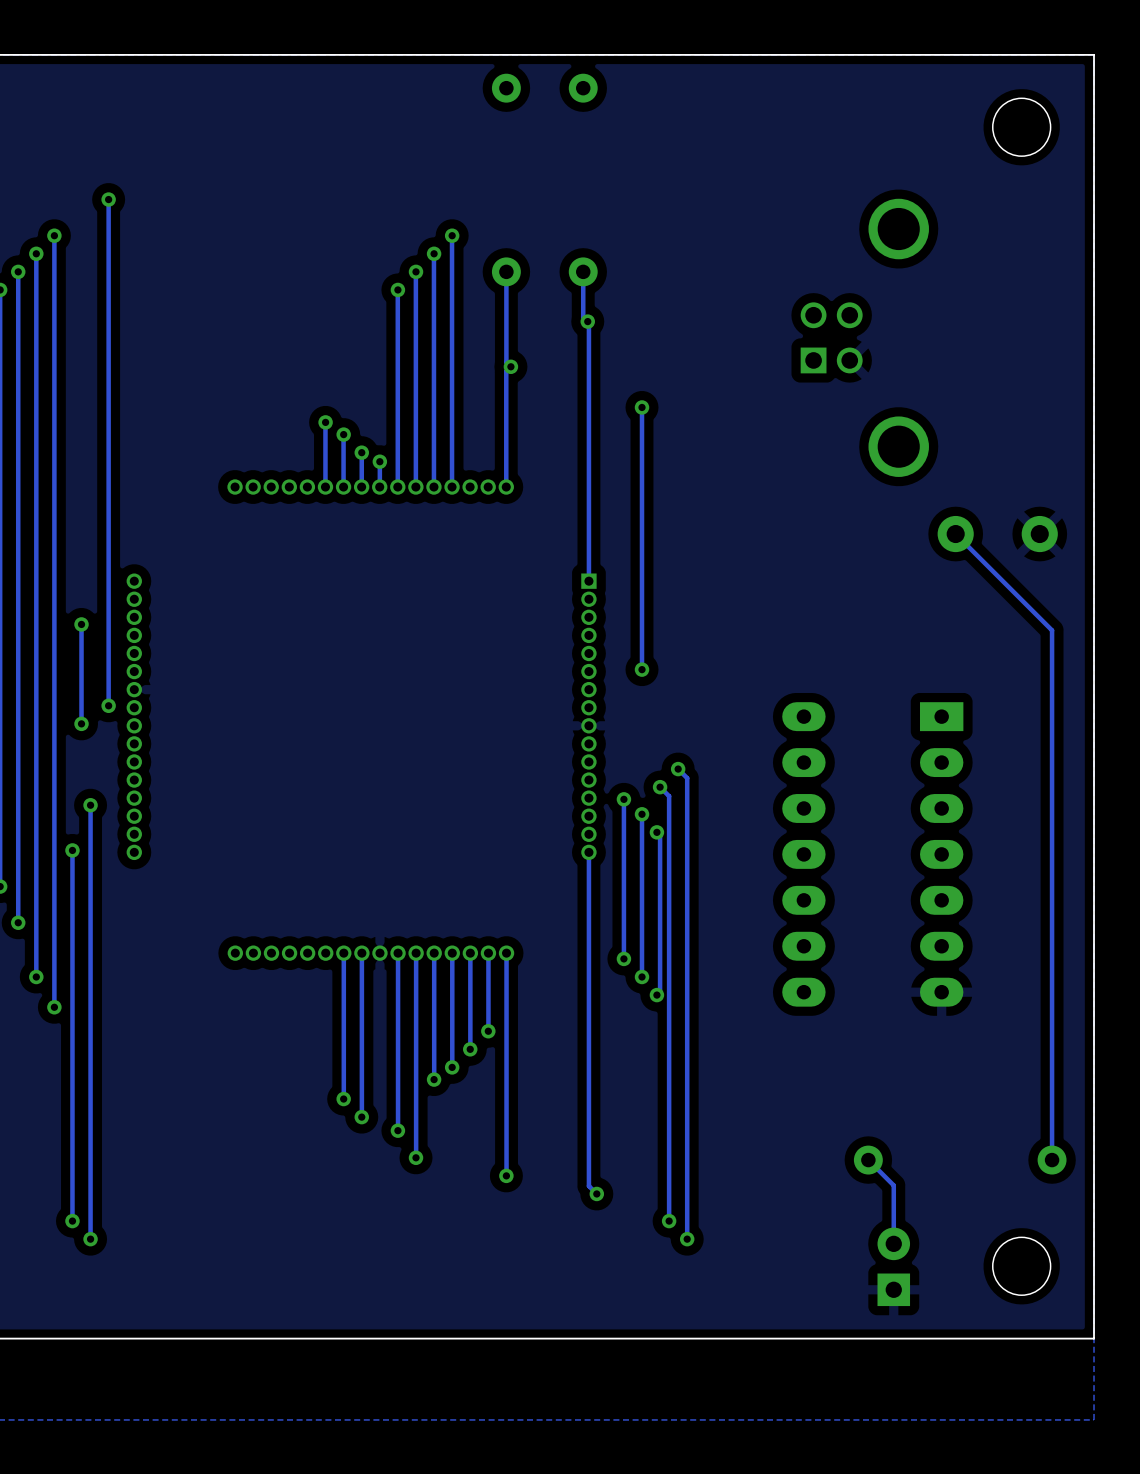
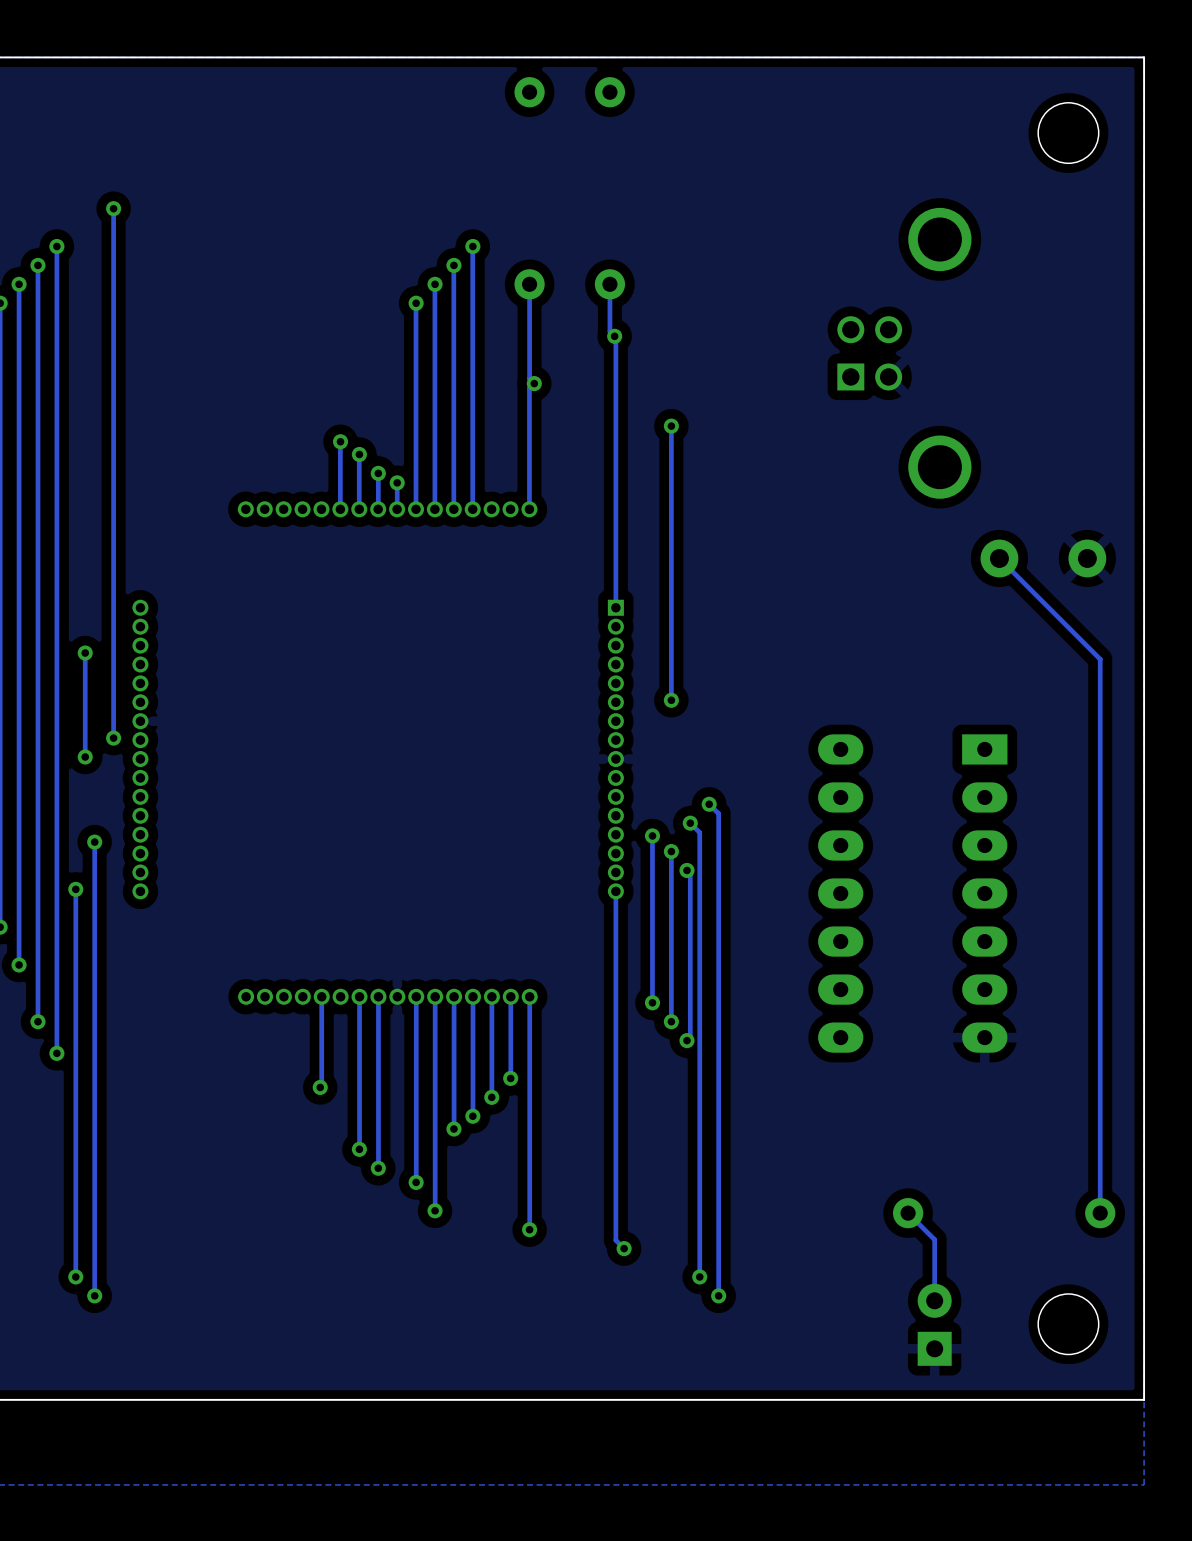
track: none -> (321, 996) (320, 1087)
via: none -> (320, 1087)

